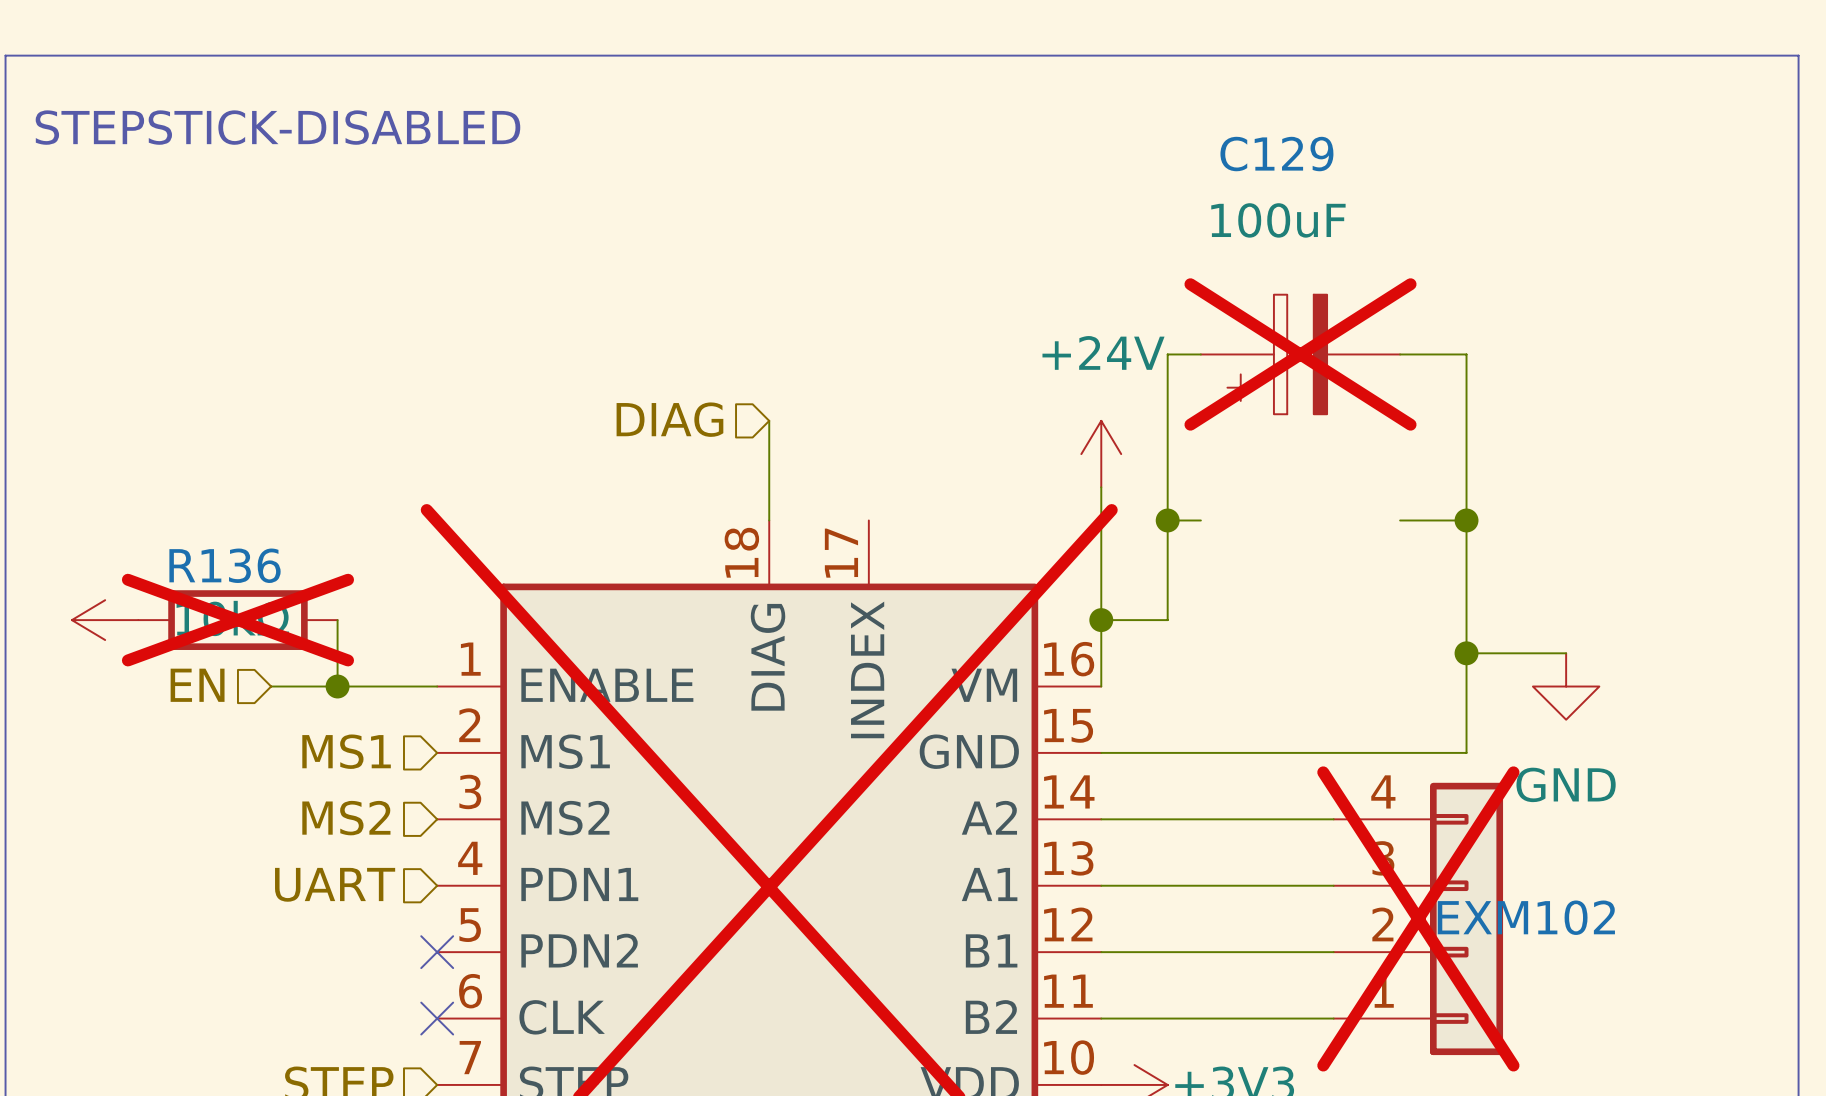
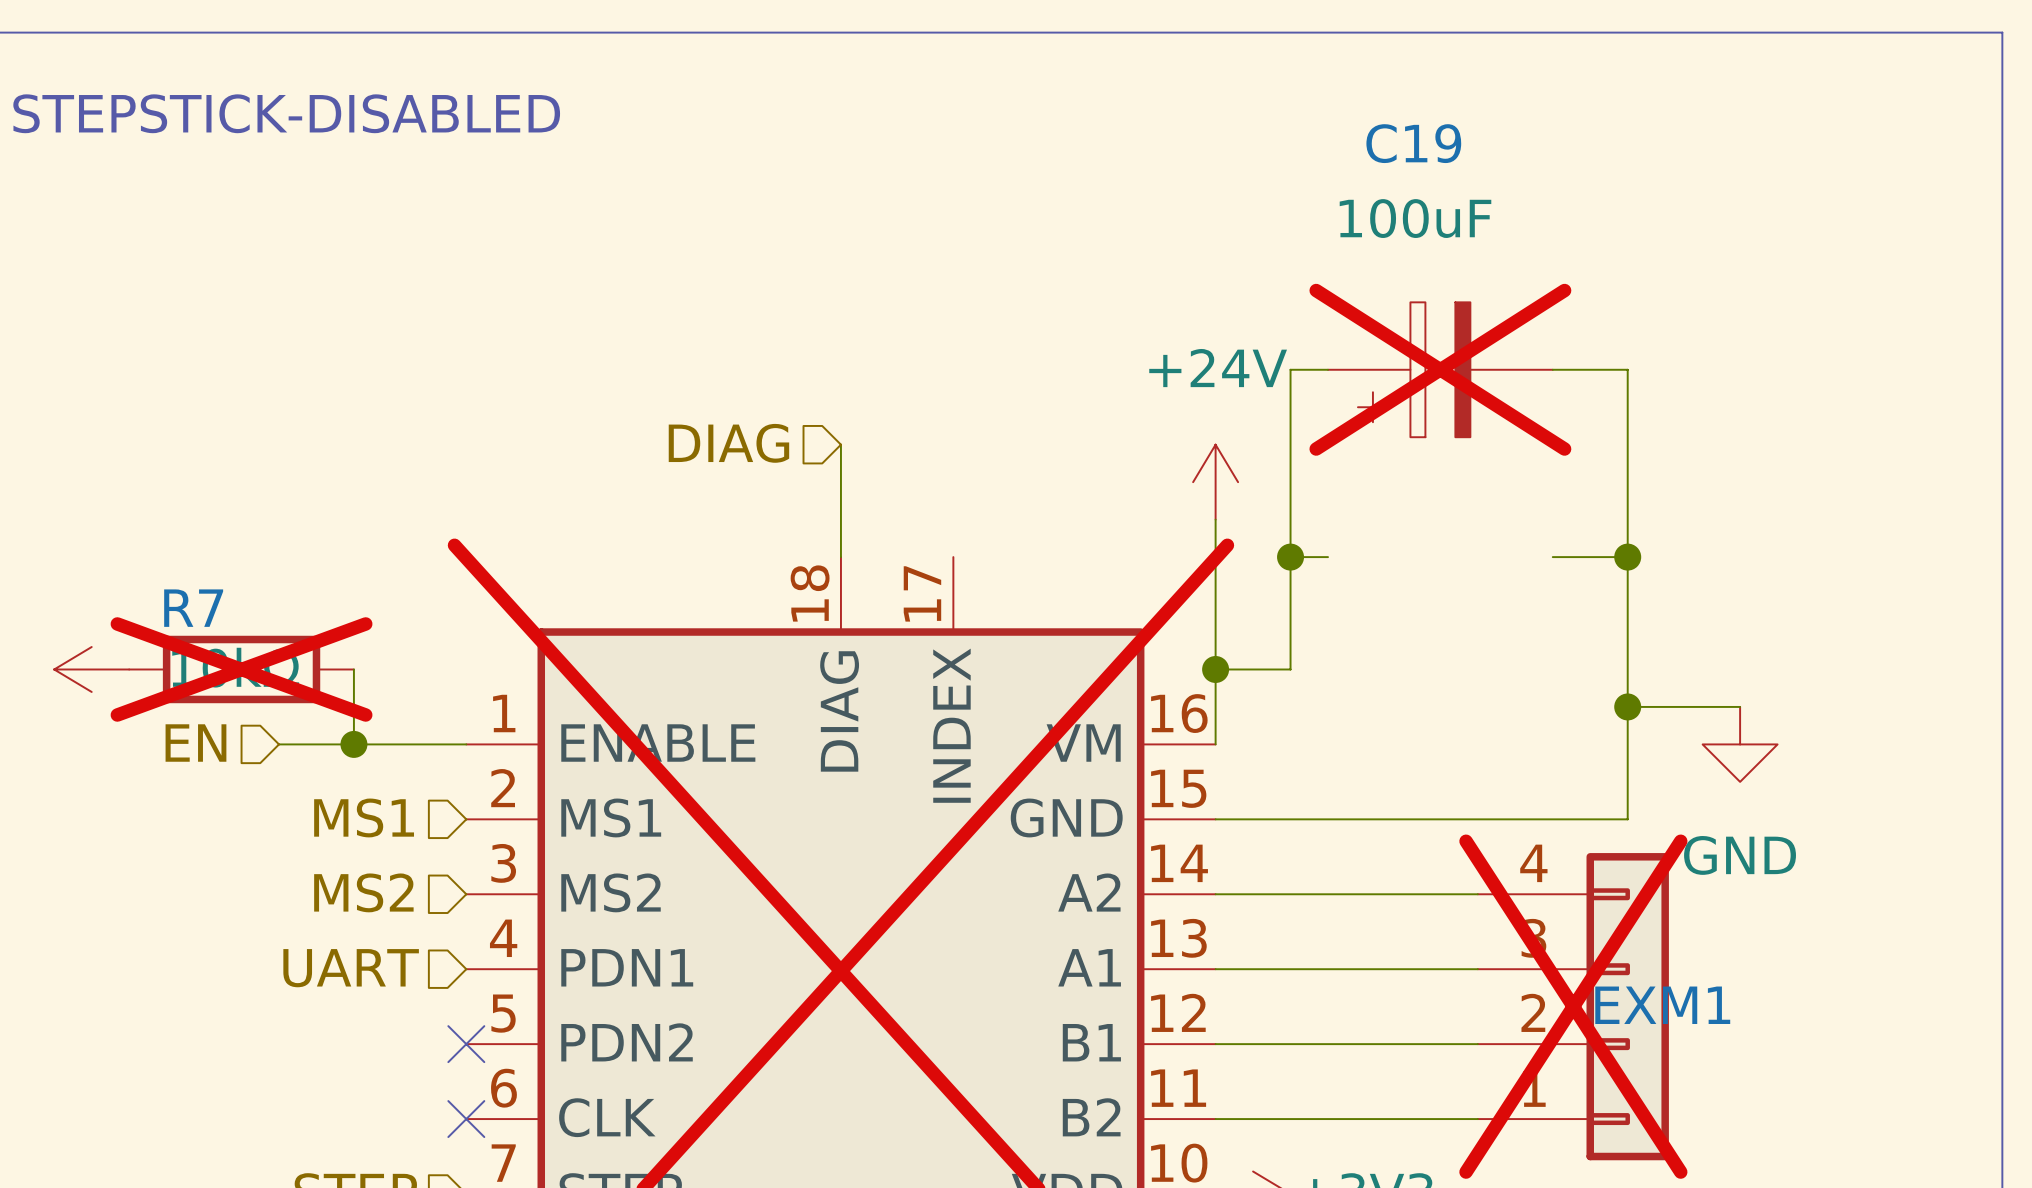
C129 name: C129 (1276, 154) -> C19 (1413, 143)
R136 name: R136 (225, 565) -> R7 (193, 608)
EXM102 name: EXM102 (1526, 917) -> EXM1 (1662, 1005)

